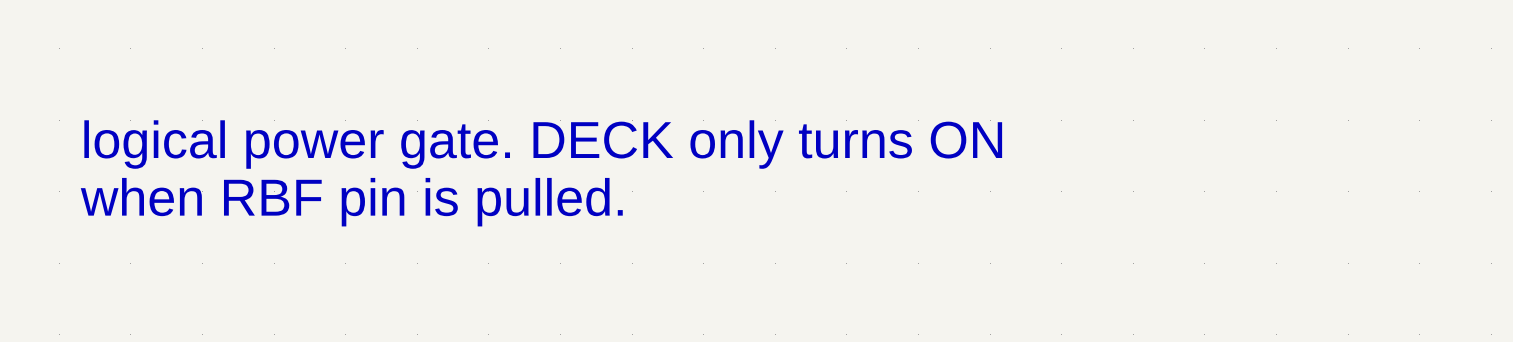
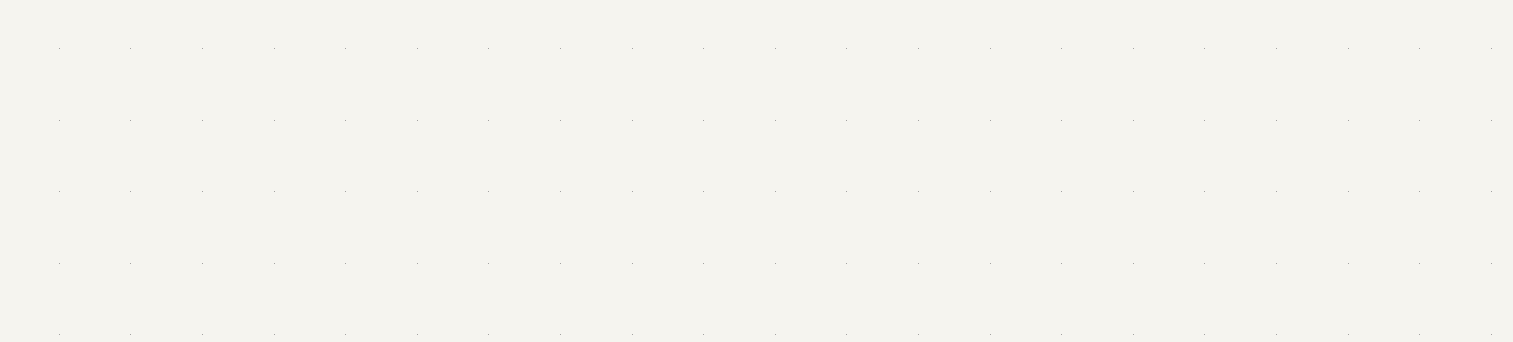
text: logical power gate. DECK only turns ON (543, 144) -> none
text: when RBF pin is pulled. (351, 202) -> none

